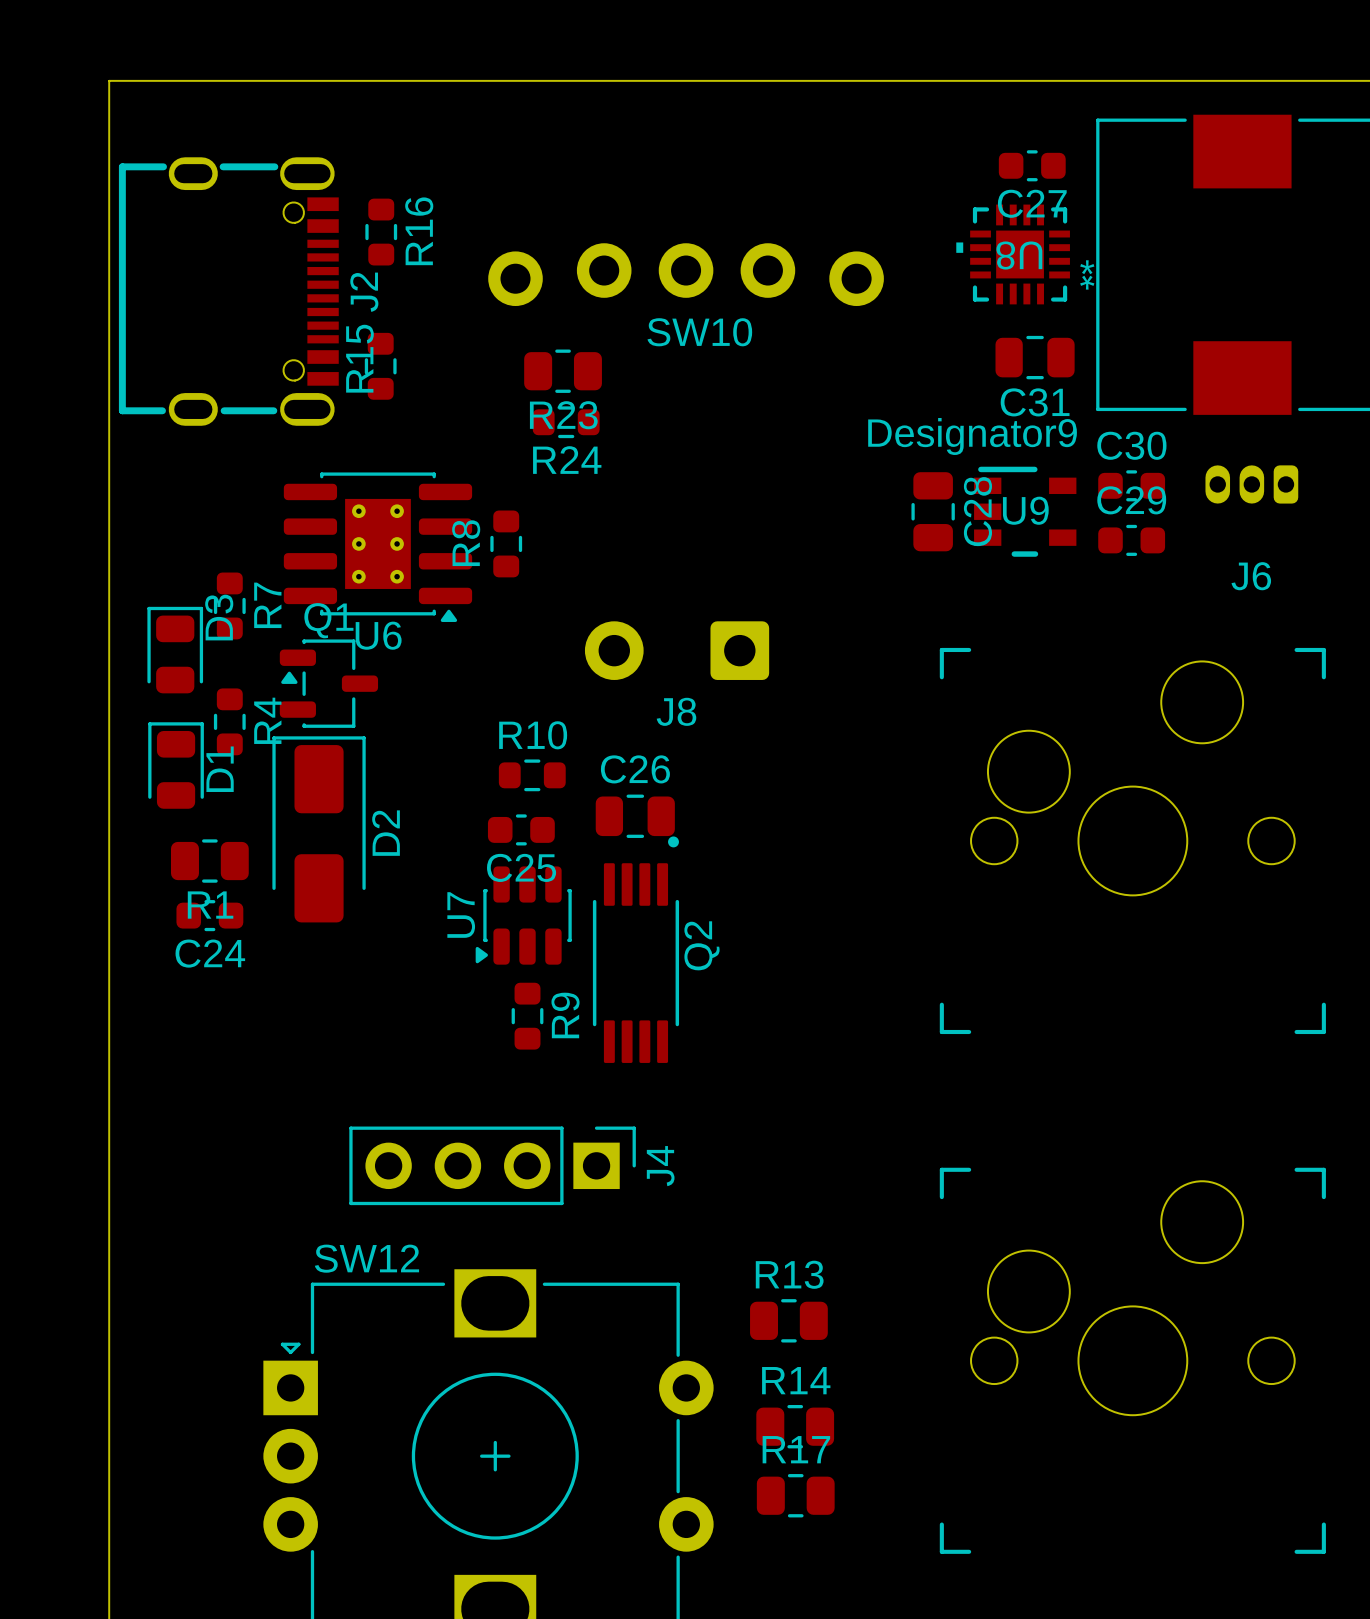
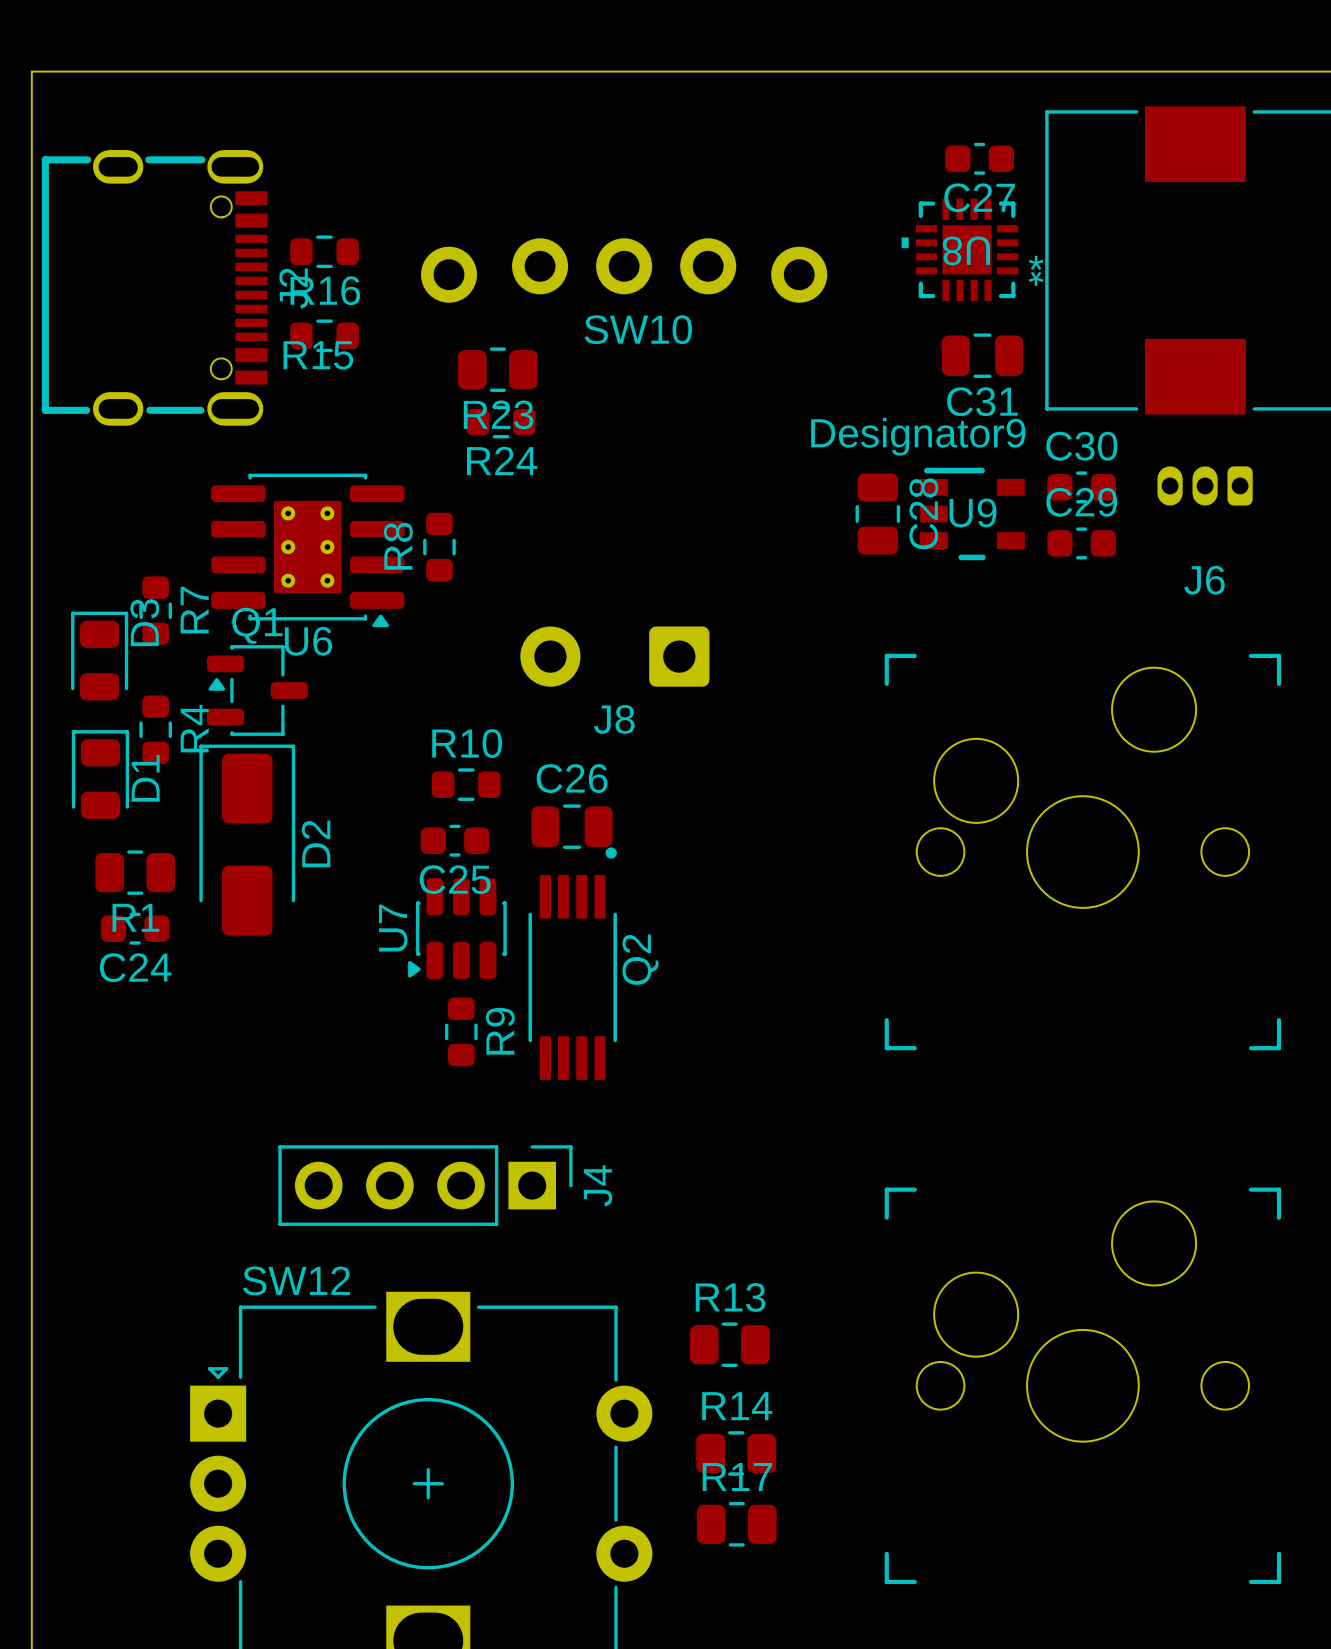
R16 rotation: 0° (381, 232) -> 90° clockwise (324, 251)
R15 rotation: 0° (380, 366) -> 90° clockwise (324, 335)

